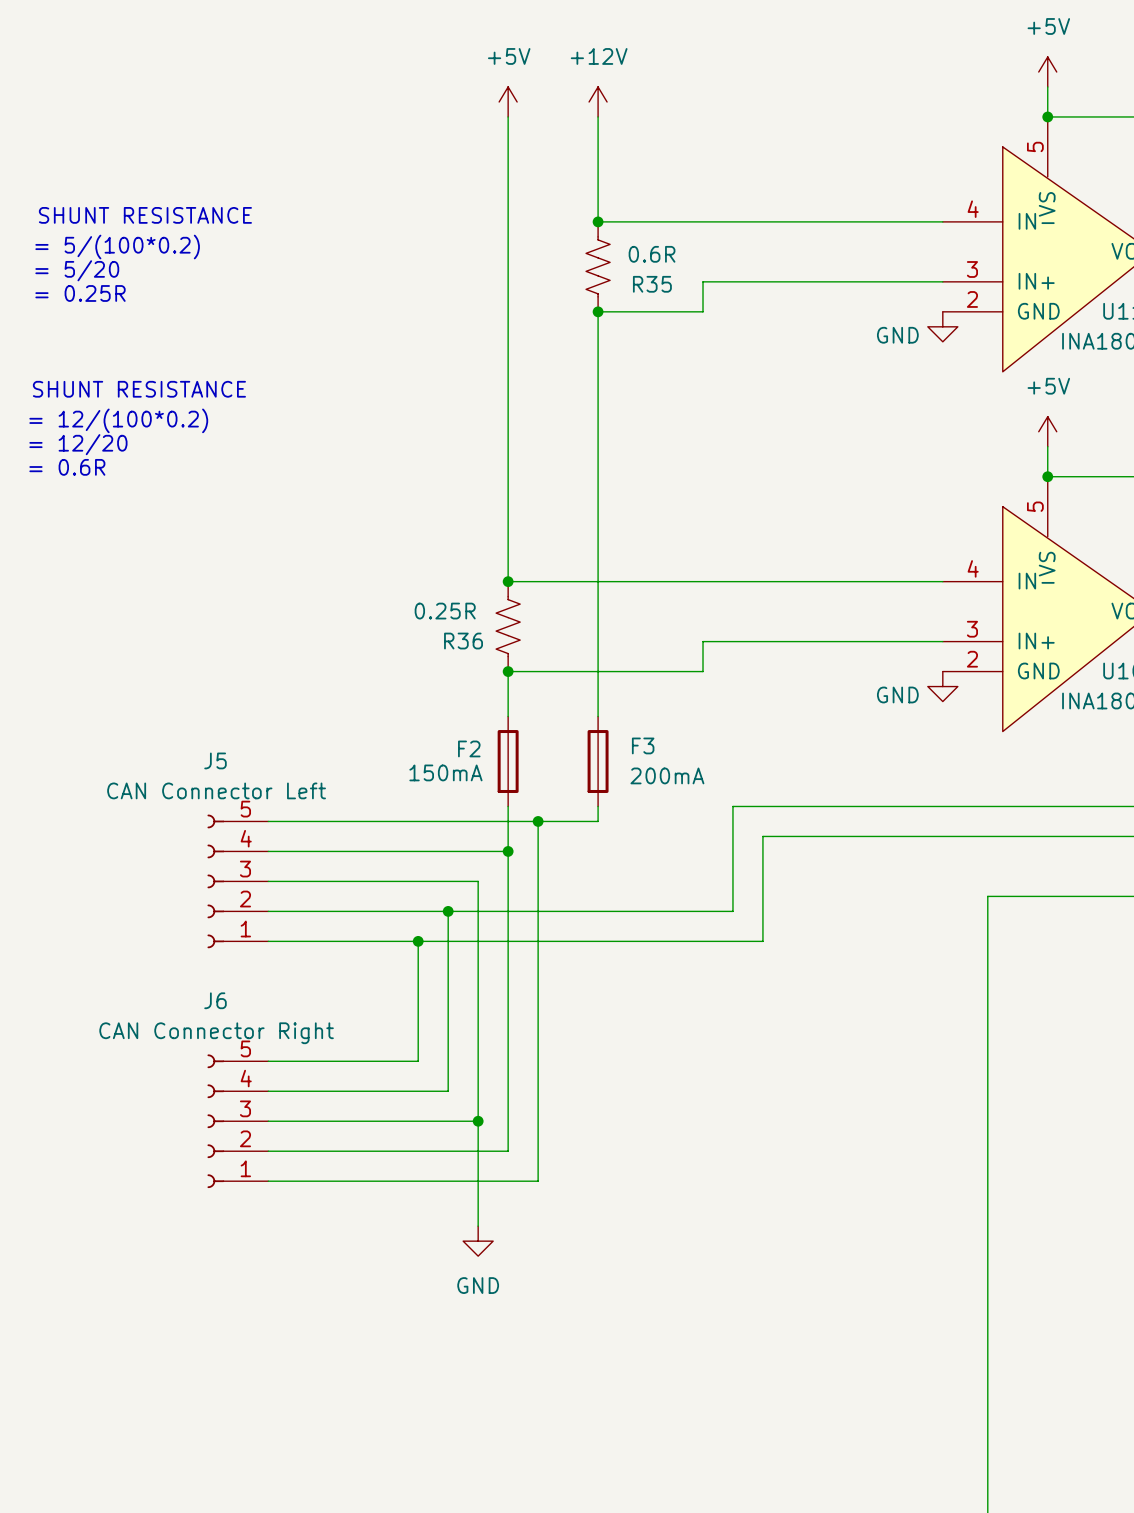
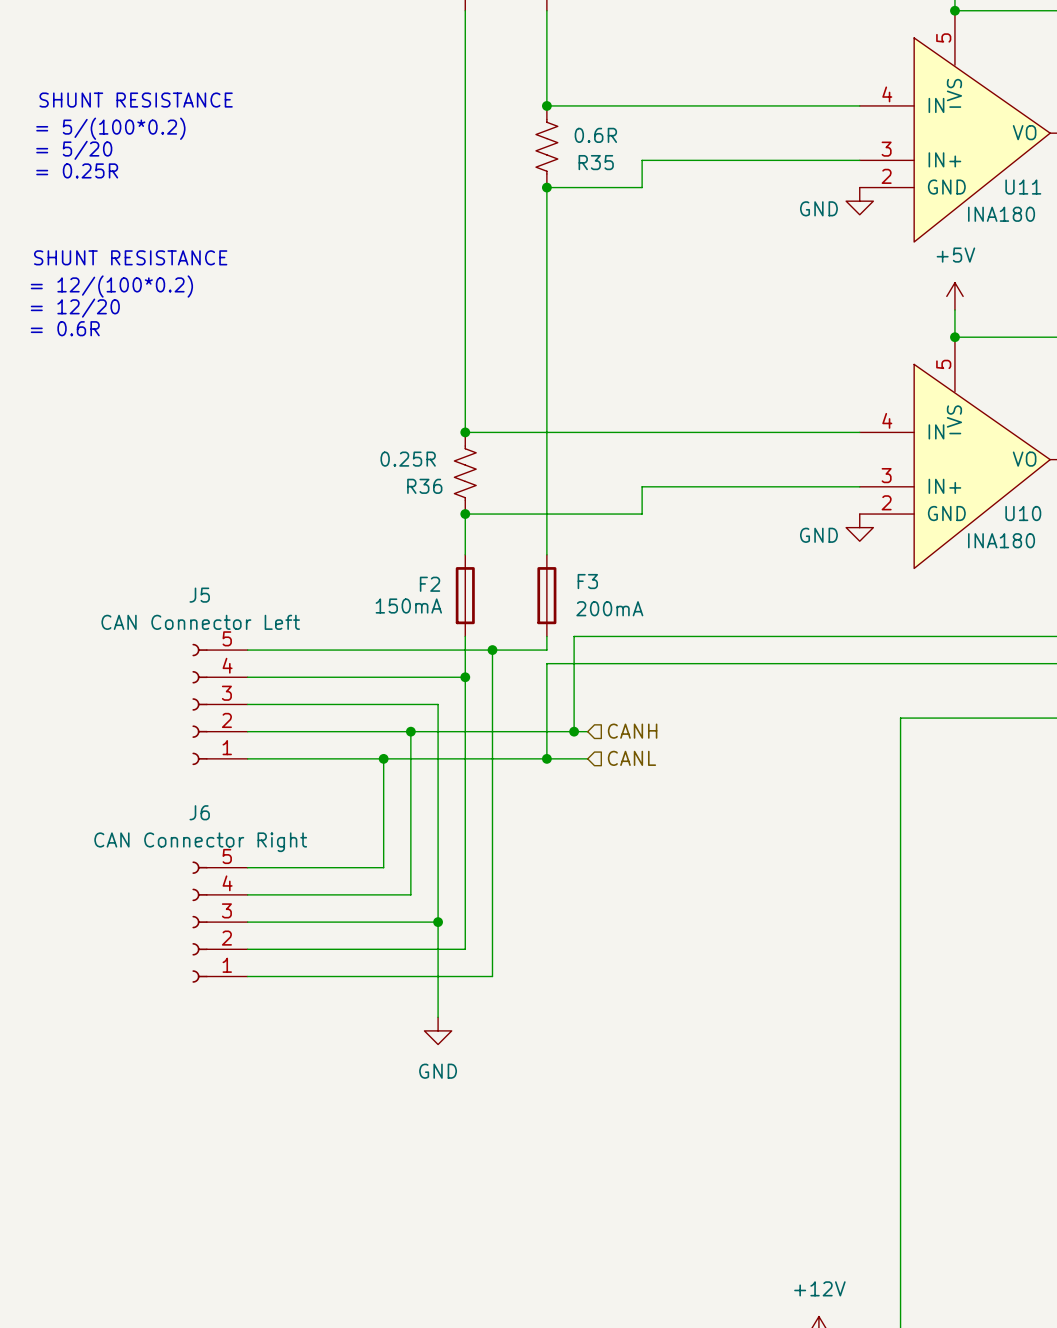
wire: (732, 806) (732, 911) (643, 911) -> (669, 636) (574, 636) (574, 731)
wire: (762, 836) (762, 941) (643, 941) -> (696, 663) (546, 663) (546, 758)
hierarchical label: none -> CANH (632, 731)
junction: none -> (574, 731)
hierarchical label: none -> CANL (631, 758)
junction: none -> (546, 758)

